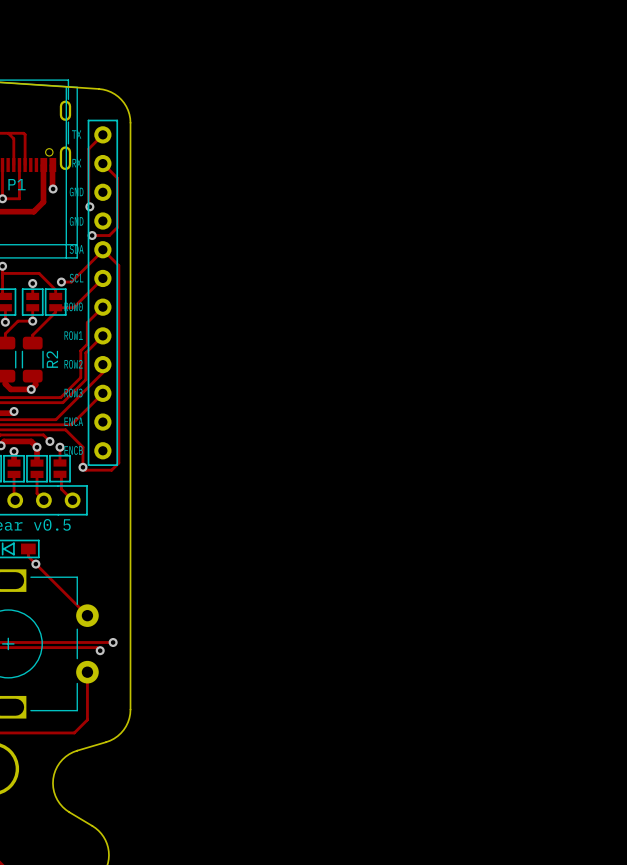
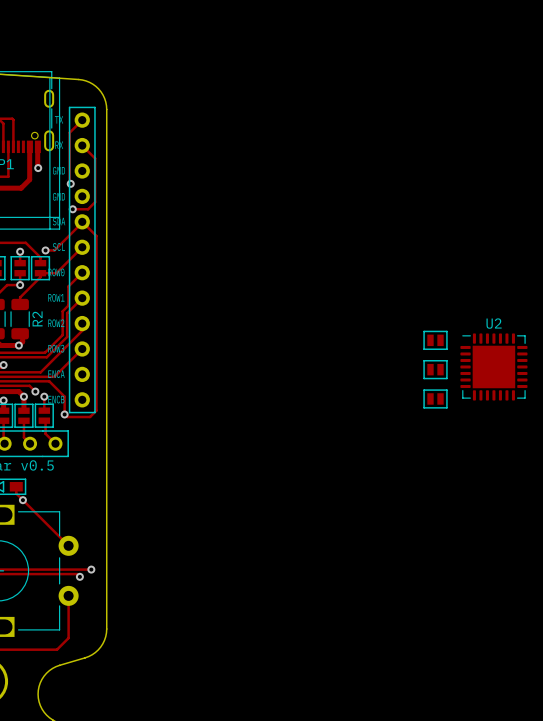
part: none -> (435, 340)
U2: none -> (493, 366)
part: none -> (435, 369)
part: none -> (435, 398)

